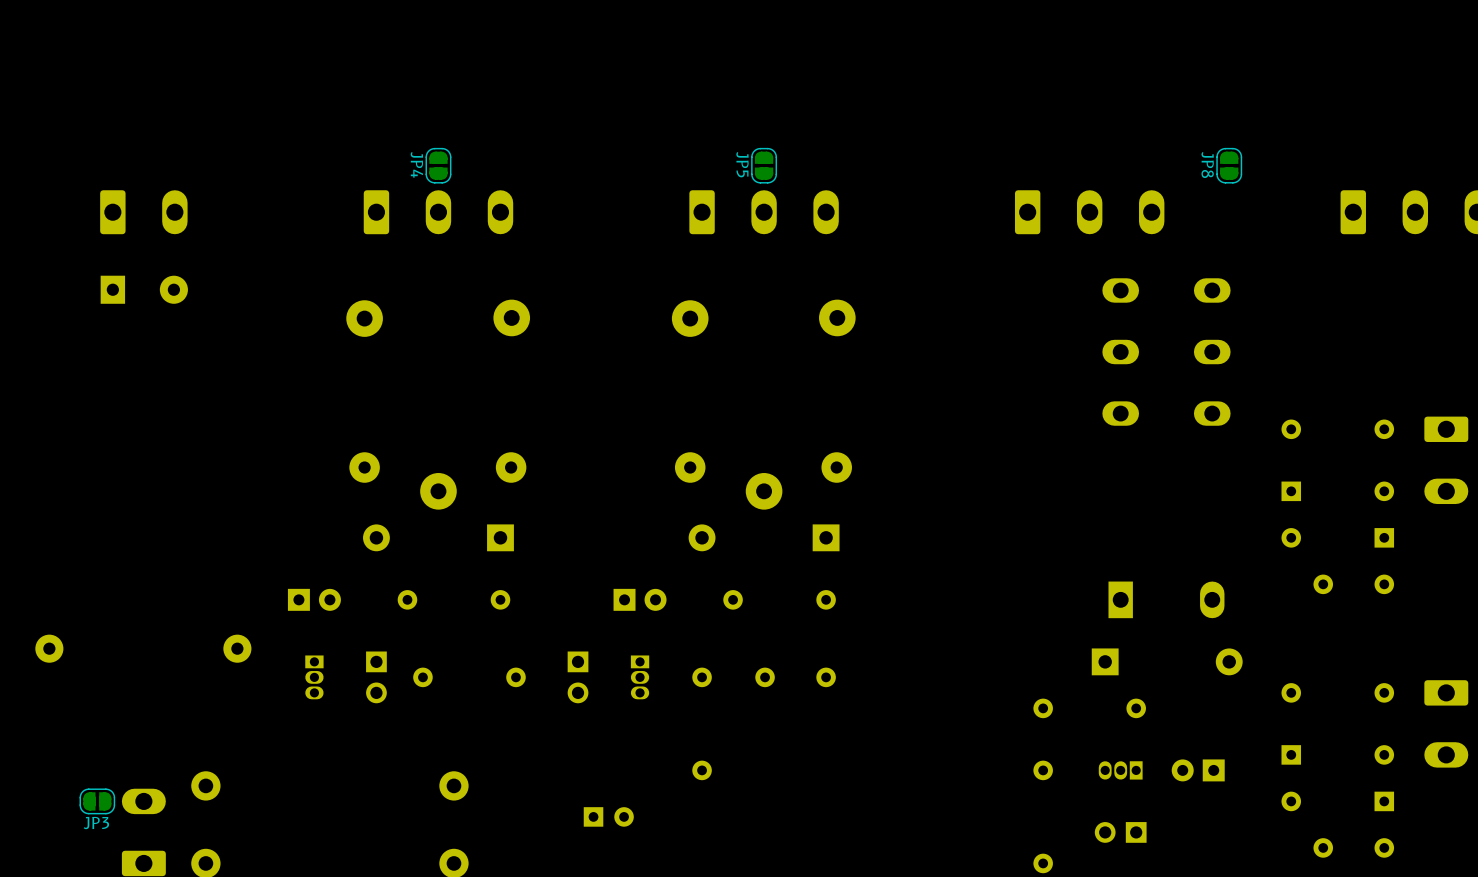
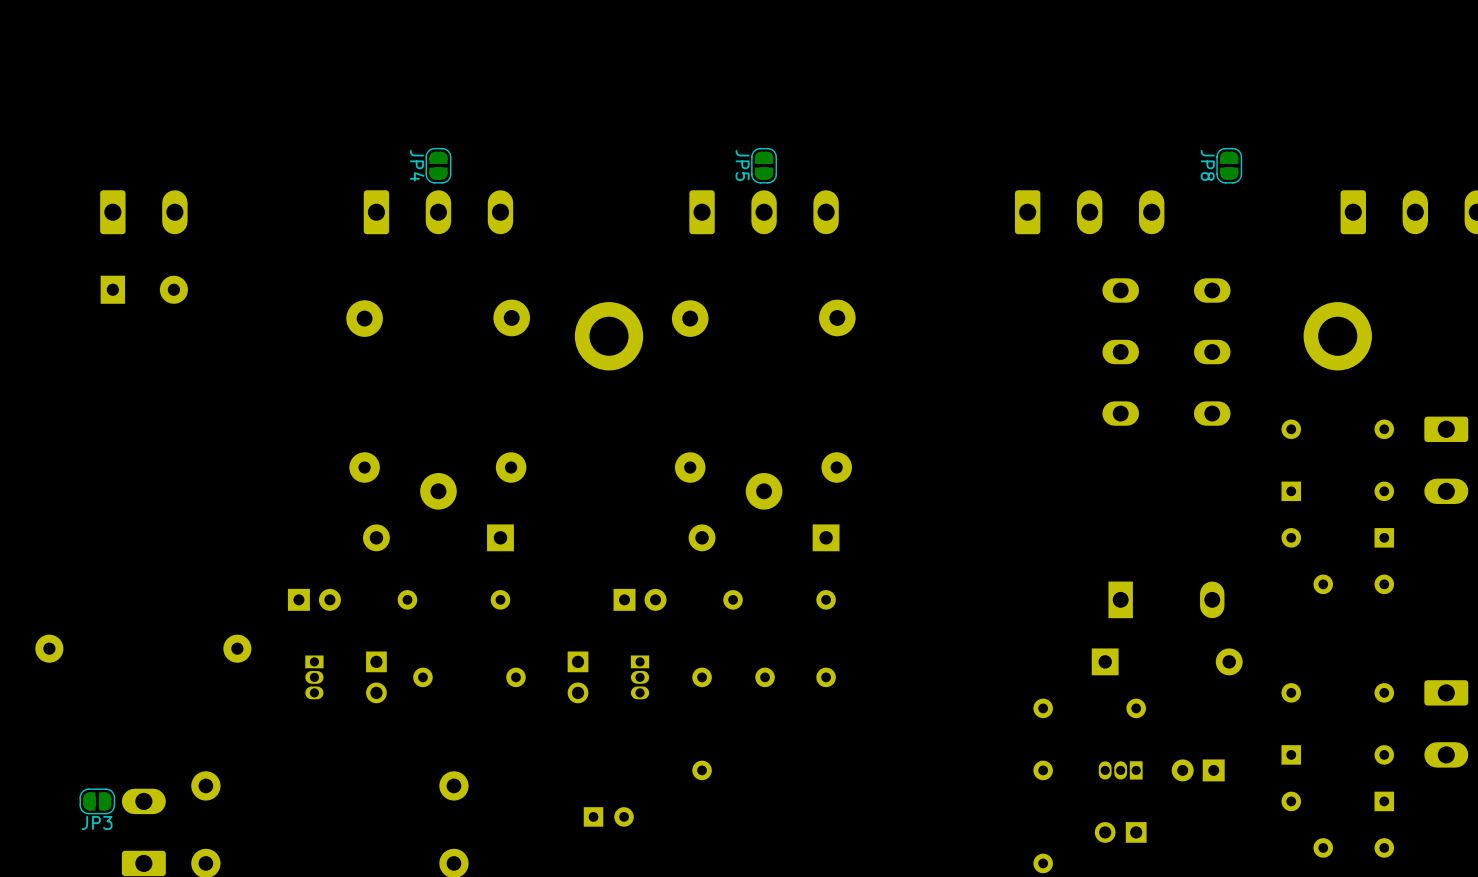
part: none -> (609, 336)
part: none -> (1337, 336)

